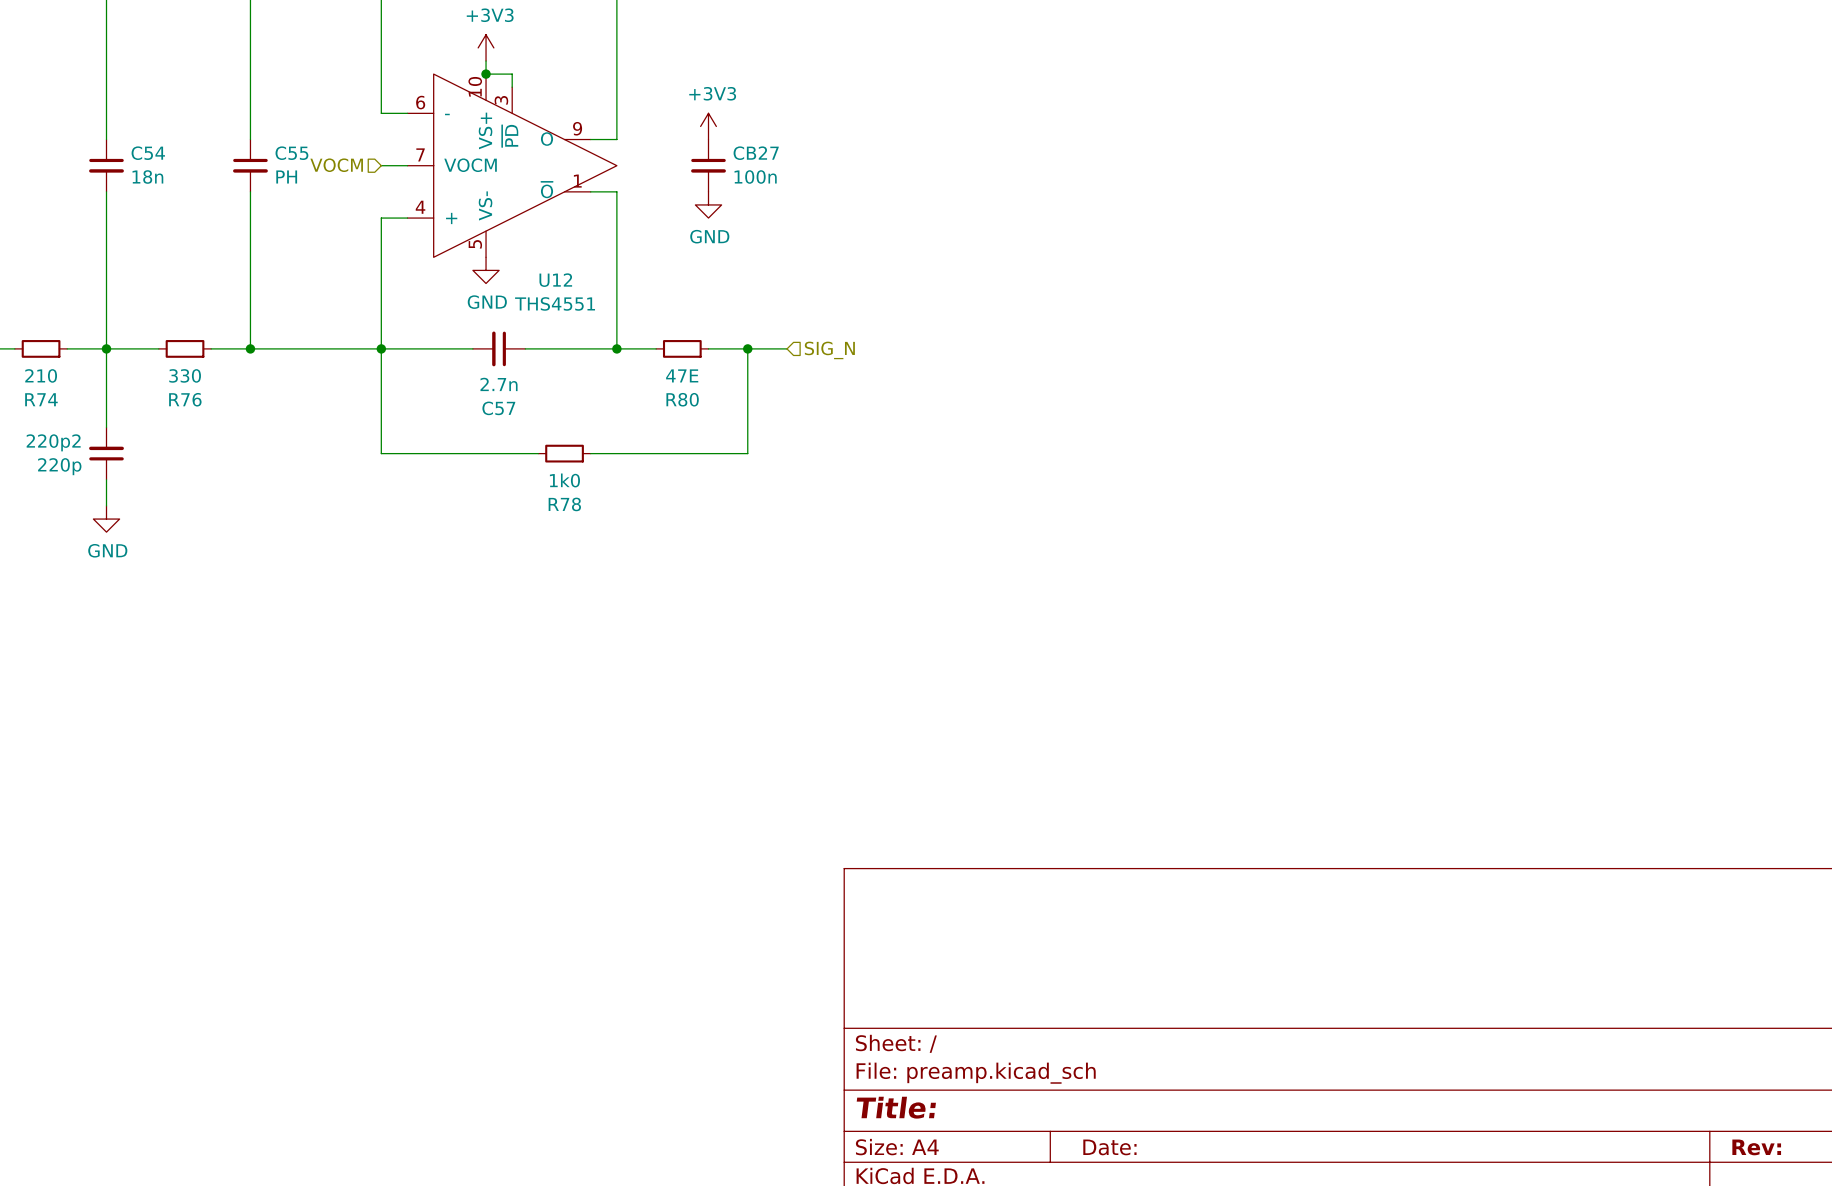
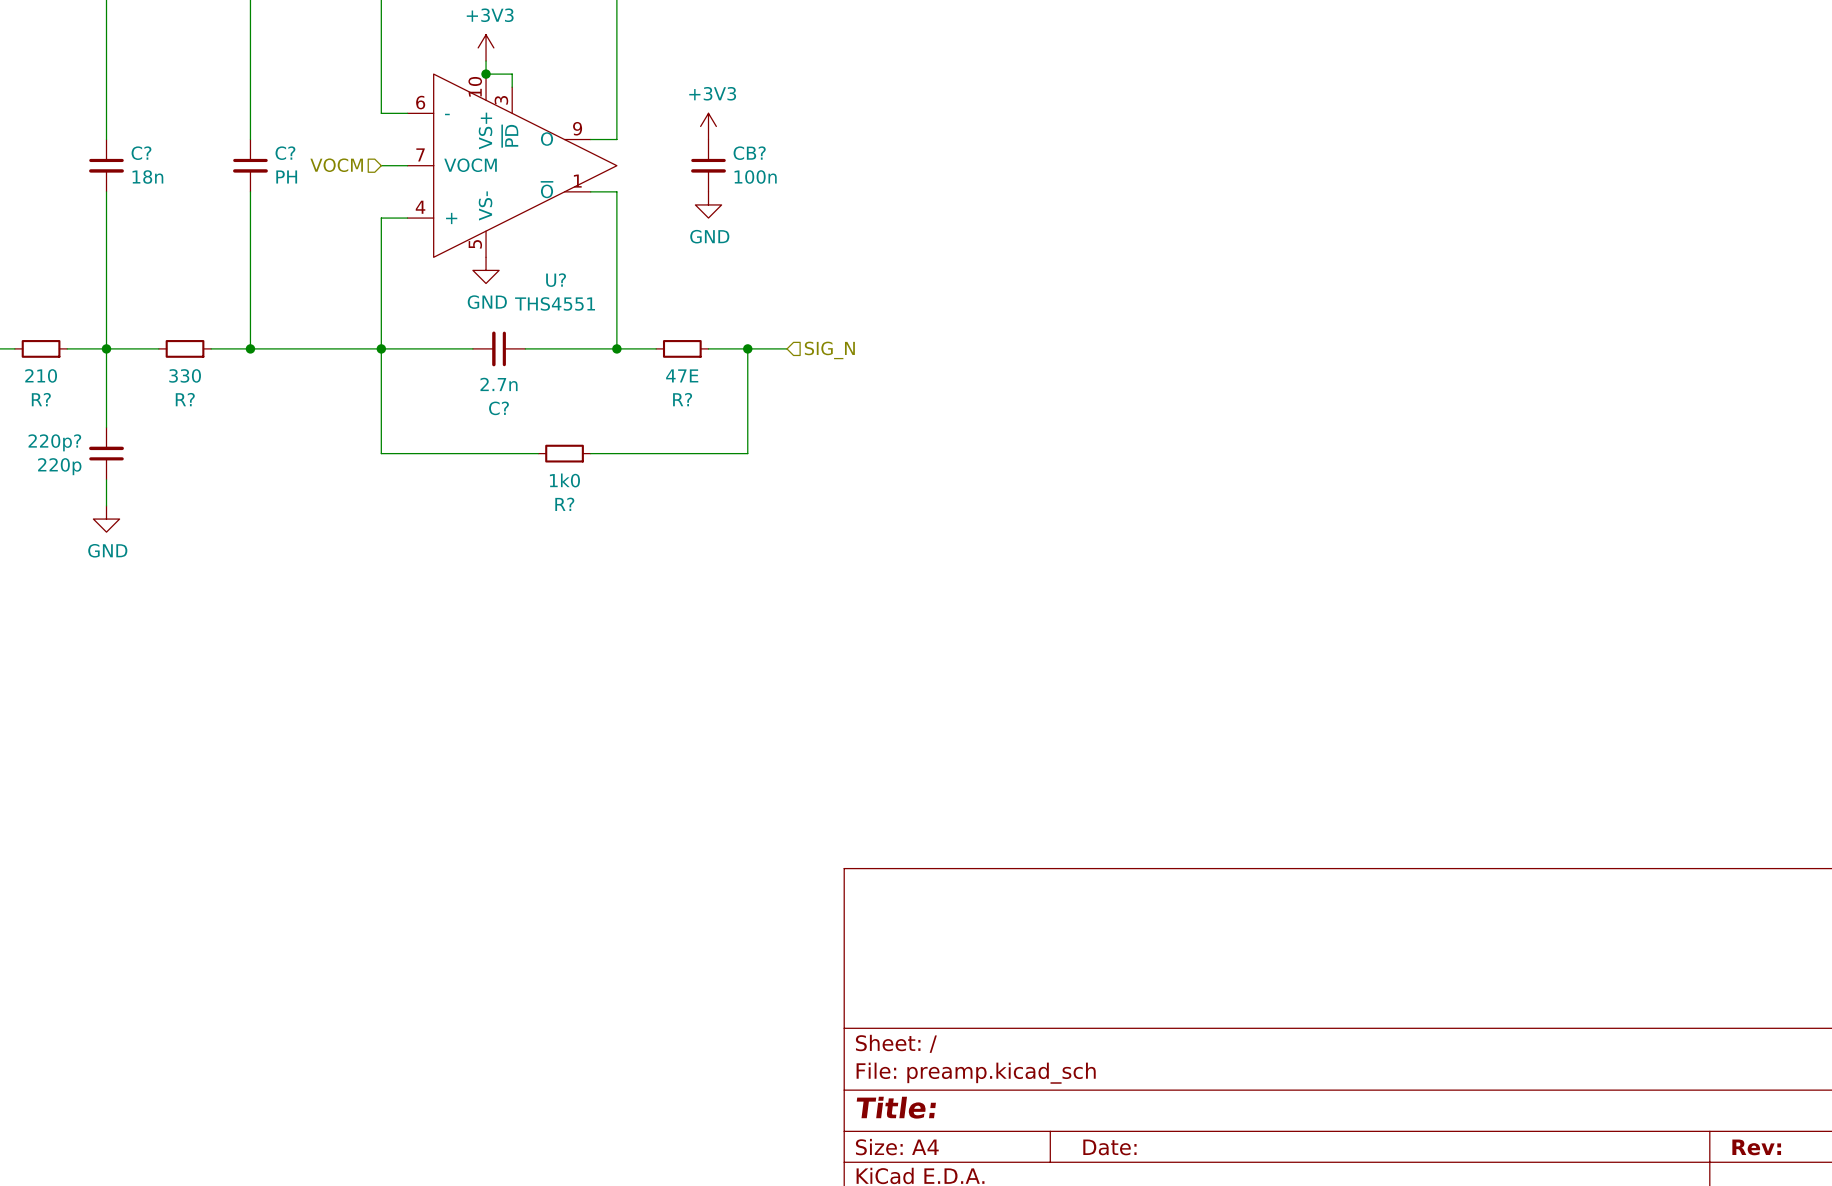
C54 name: C54 (148, 153) -> C? (141, 153)
C55 name: C55 (291, 153) -> C? (285, 153)
CB27 name: CB27 (756, 153) -> CB? (749, 153)
U12 name: U12 (555, 280) -> U? (556, 280)
R74 name: R74 (41, 399) -> R? (41, 399)
R76 name: R76 (185, 399) -> R? (185, 399)
R80 name: R80 (682, 399) -> R? (682, 399)
C57 name: C57 (498, 408) -> C? (498, 408)
220p2 name: 220p2 (53, 442) -> 220p? (54, 442)
R78 name: R78 (564, 504) -> R? (564, 504)

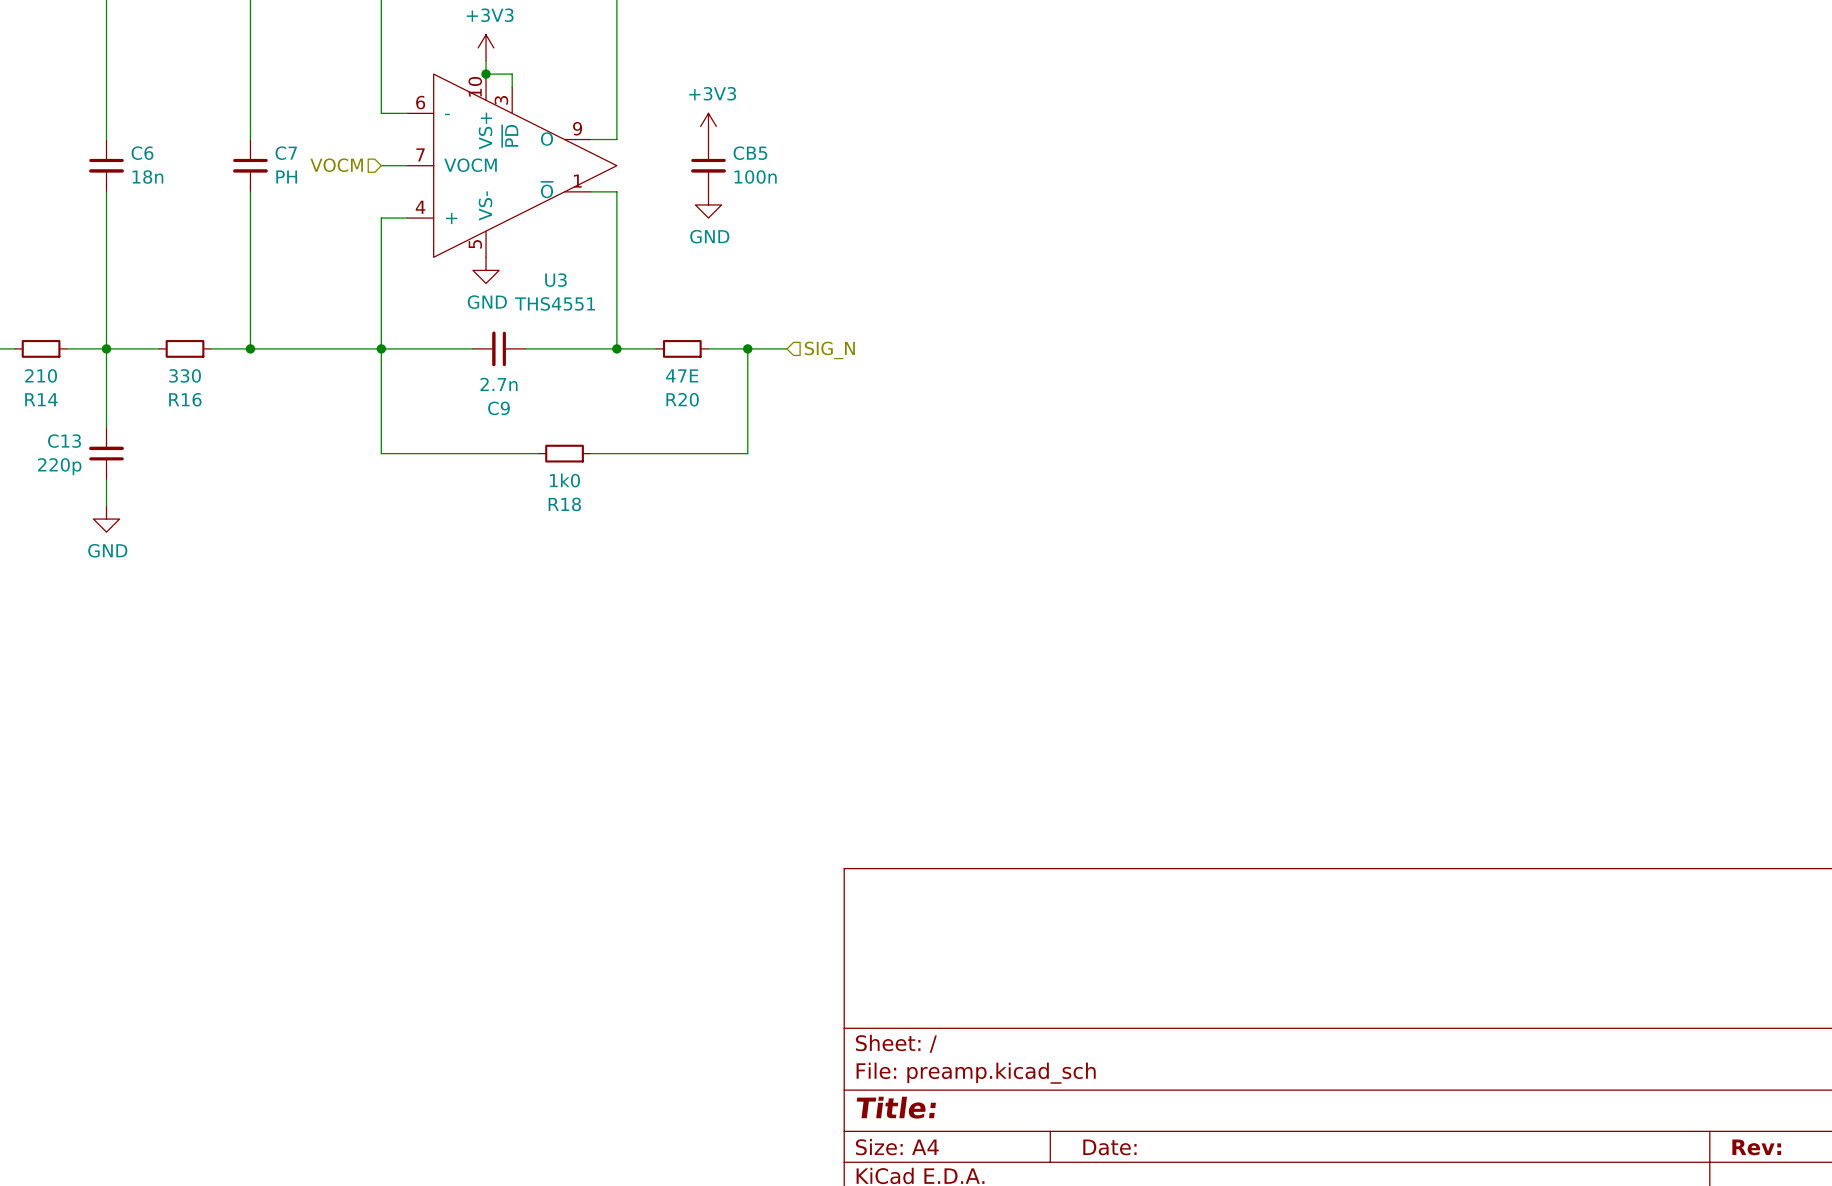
C? name: C? (141, 153) -> C6 (142, 153)
C? name: C? (285, 153) -> C7 (286, 153)
CB? name: CB? (749, 153) -> CB5 (750, 153)
U? name: U? (556, 280) -> U3 (555, 280)
R? name: R? (41, 399) -> R14 (41, 399)
R? name: R? (185, 399) -> R16 (185, 399)
R? name: R? (682, 399) -> R20 (682, 399)
C? name: C? (498, 408) -> C9 (498, 408)
220p? name: 220p? (54, 442) -> C13 (64, 441)
R? name: R? (564, 504) -> R18 (564, 504)

